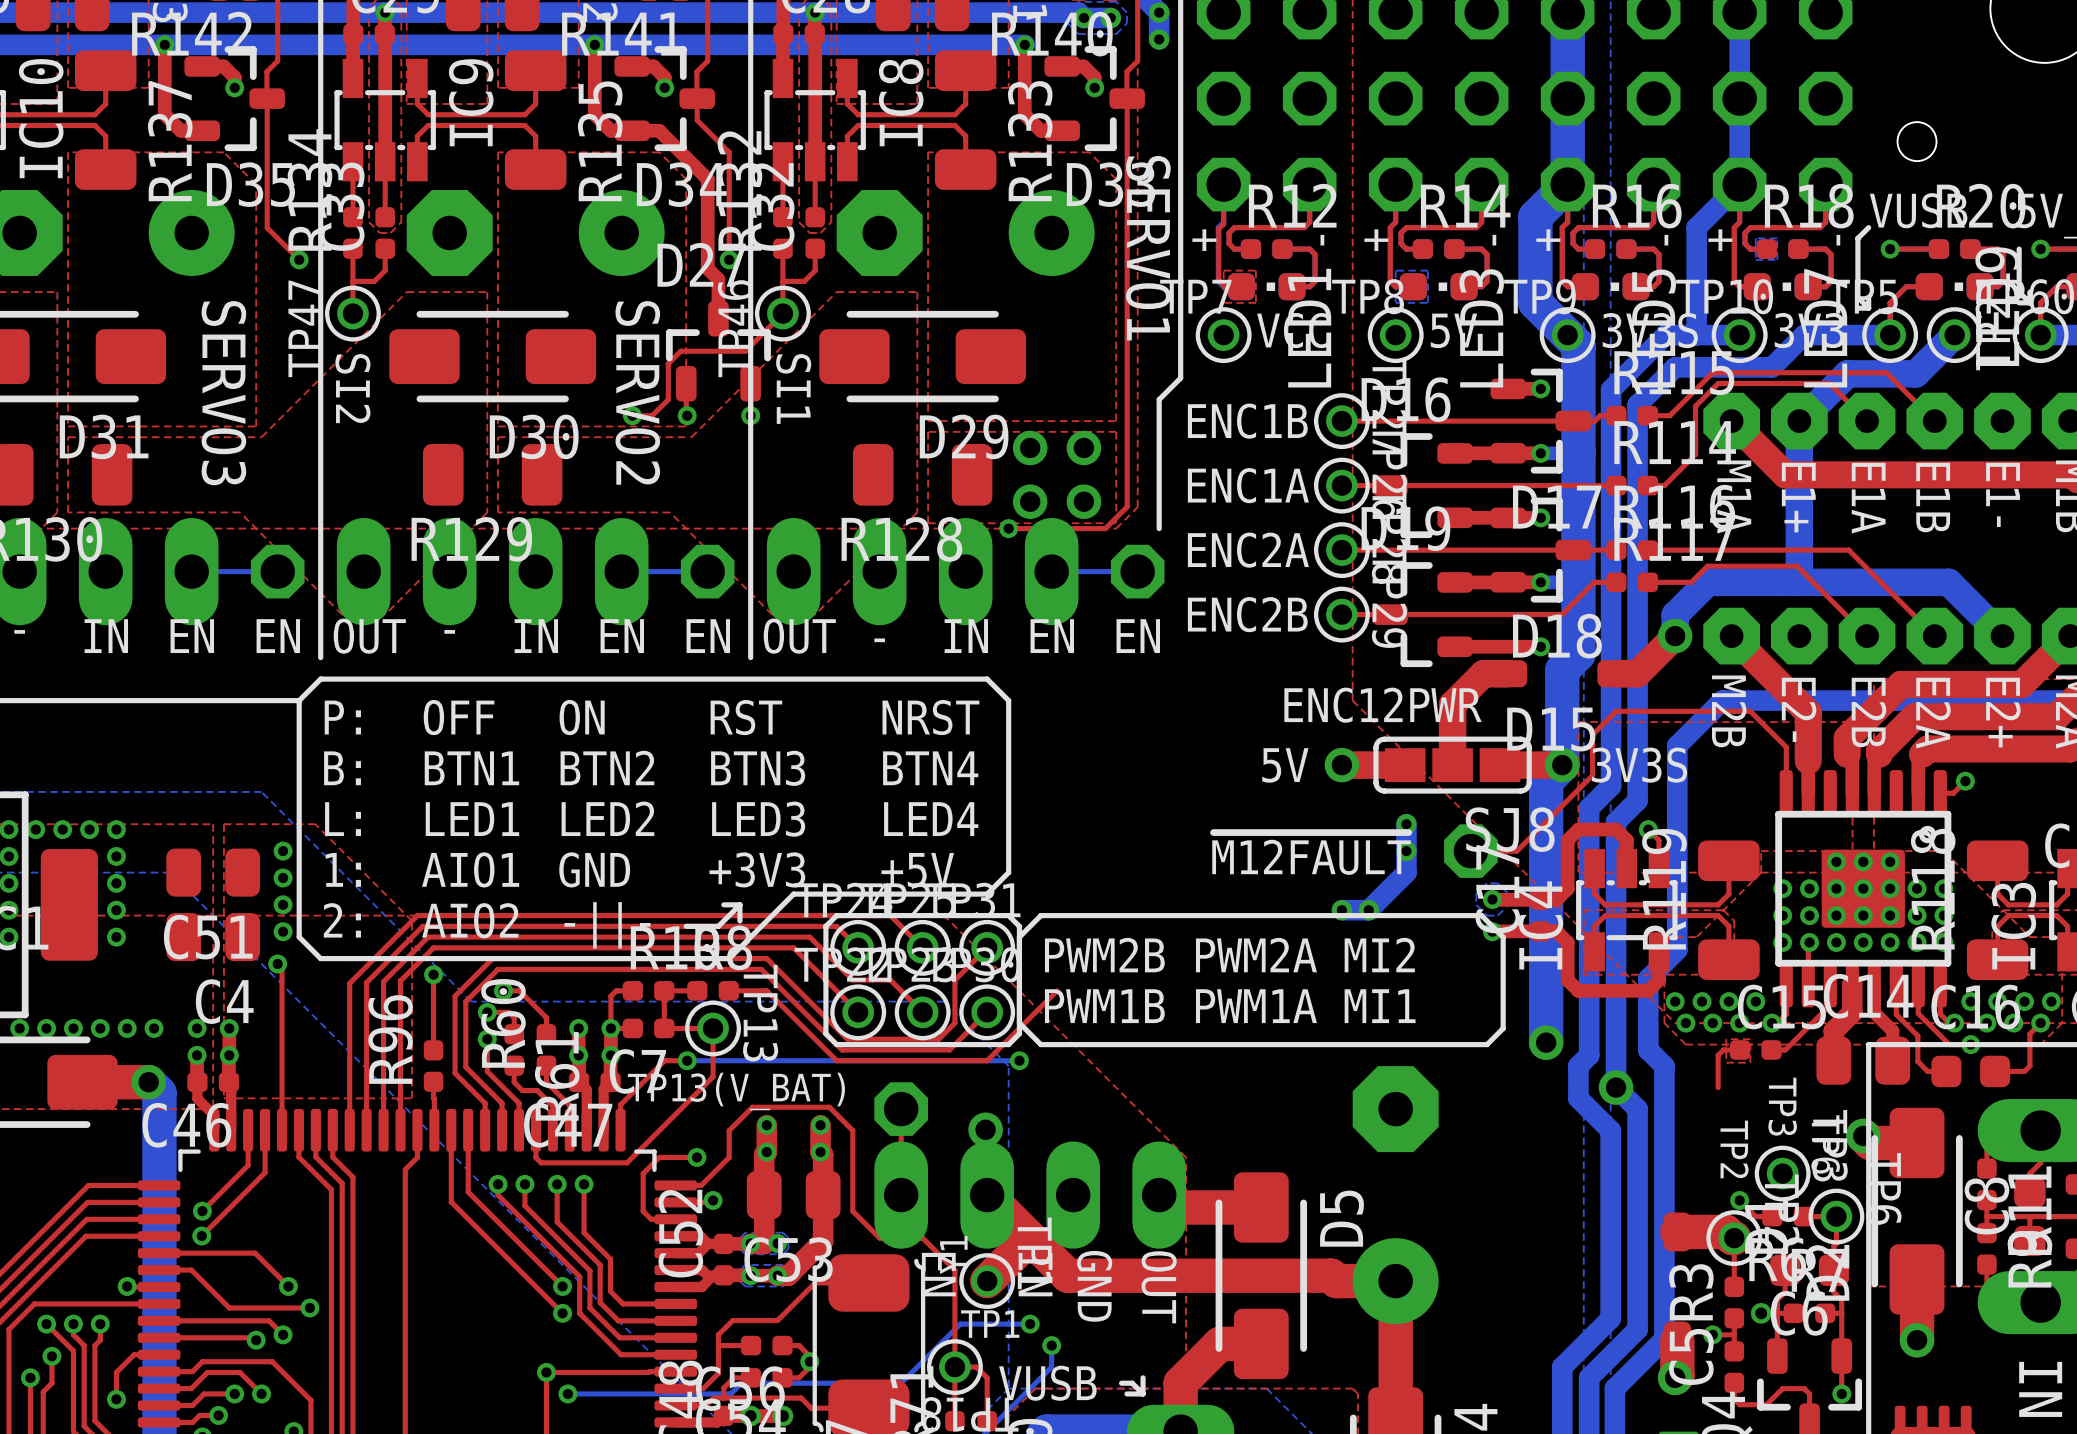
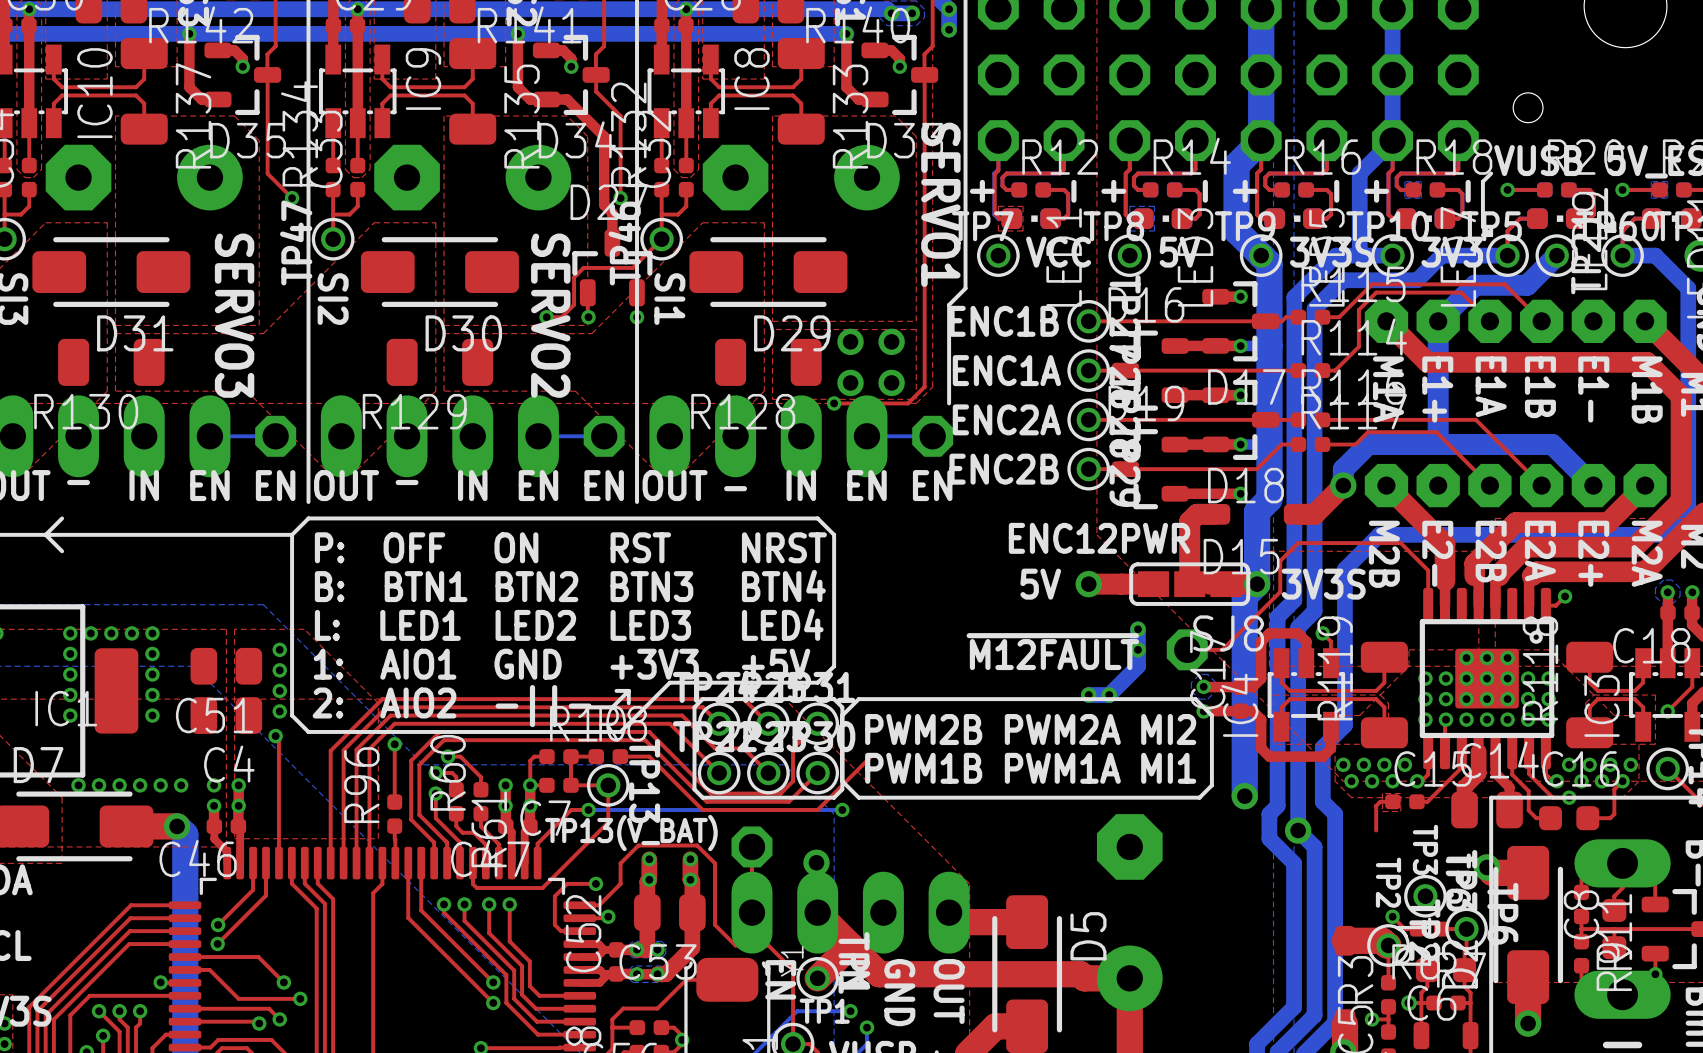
top track: (1474, 683) (1452, 704) (1452, 765) -> (1189, 521) (1189, 584)
SJ8 position: (1452, 765) -> (1189, 584)

